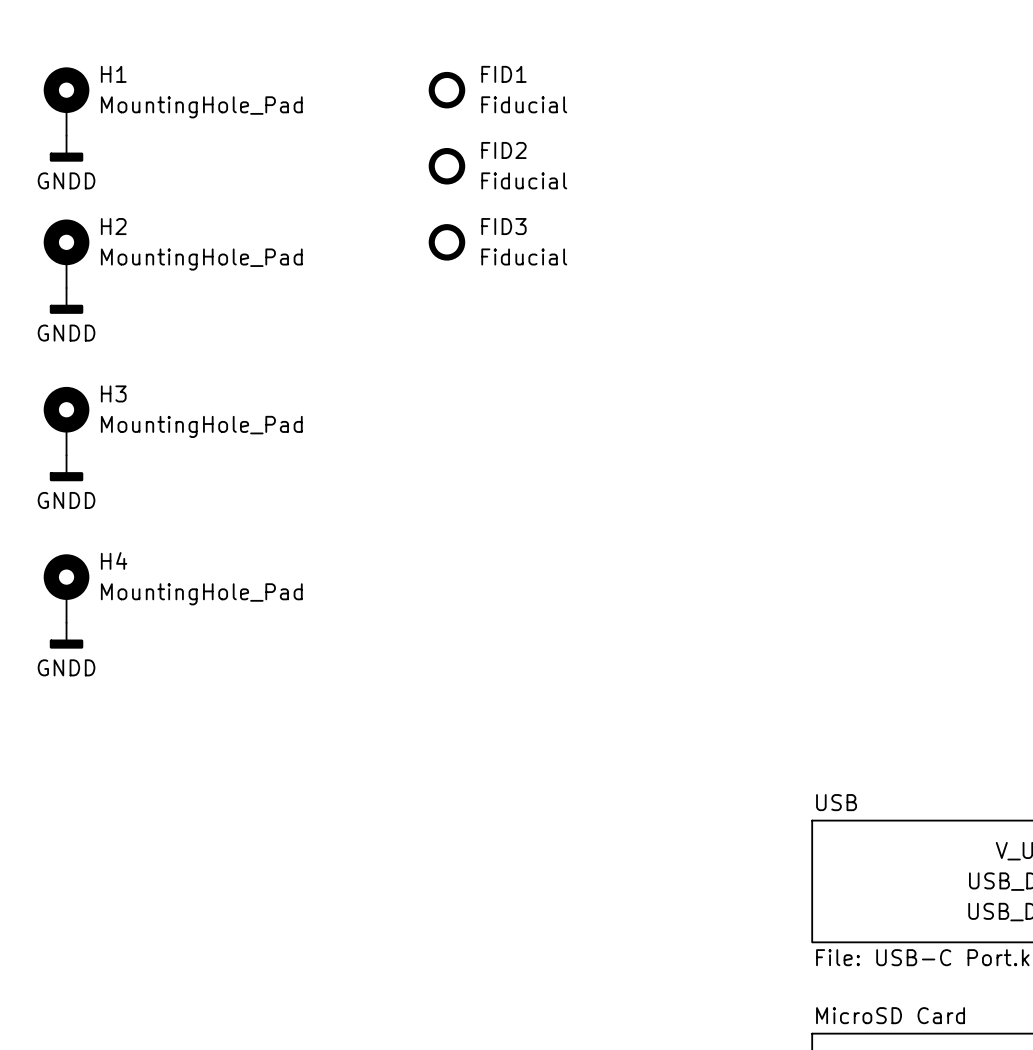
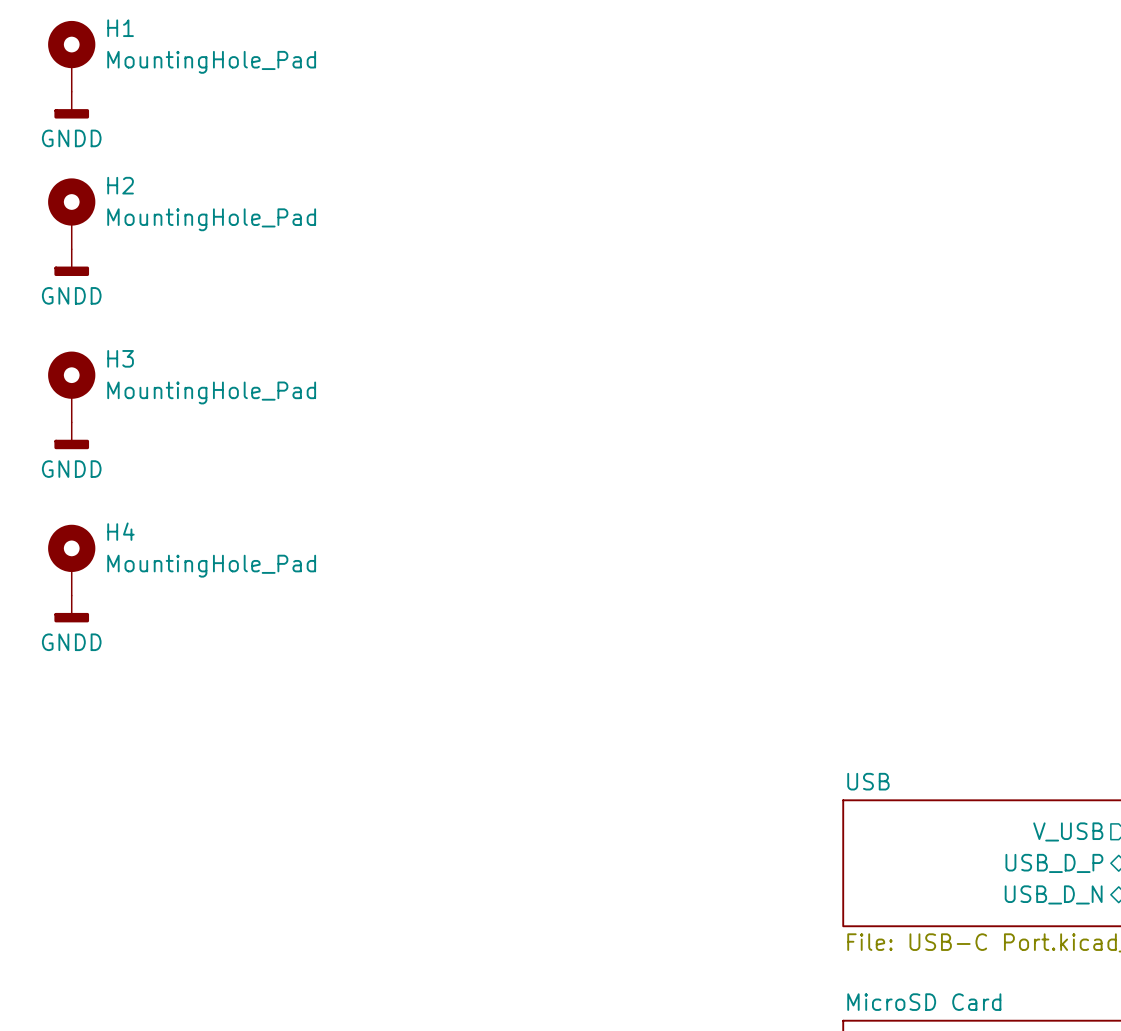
FID1: Fiducial (446, 90) -> none
FID2: Fiducial (446, 166) -> none
FID3: Fiducial (446, 242) -> none

